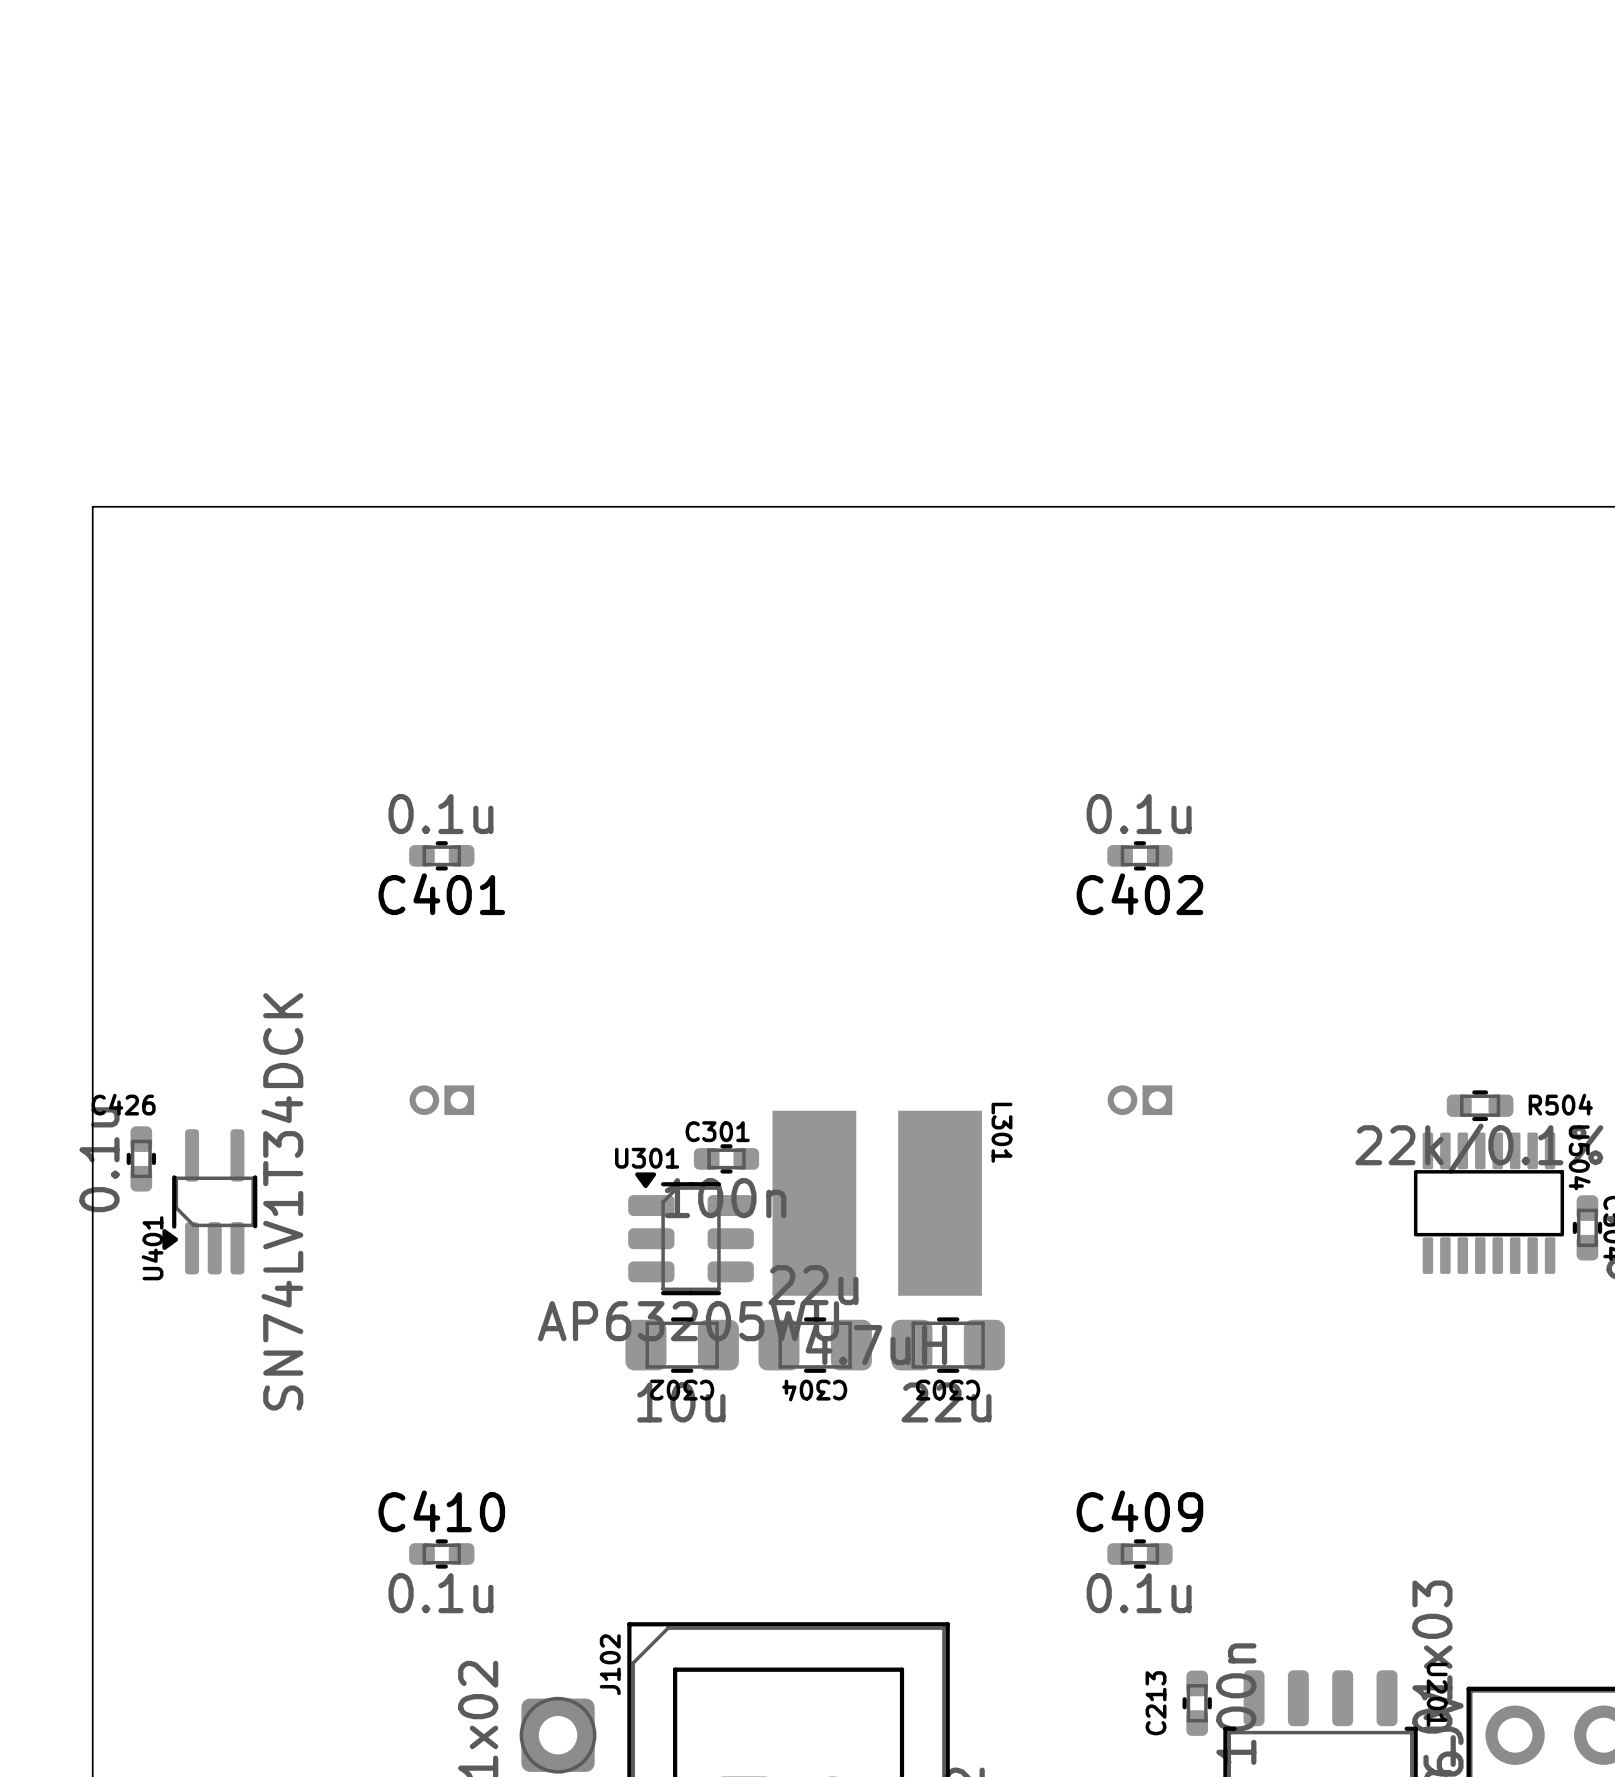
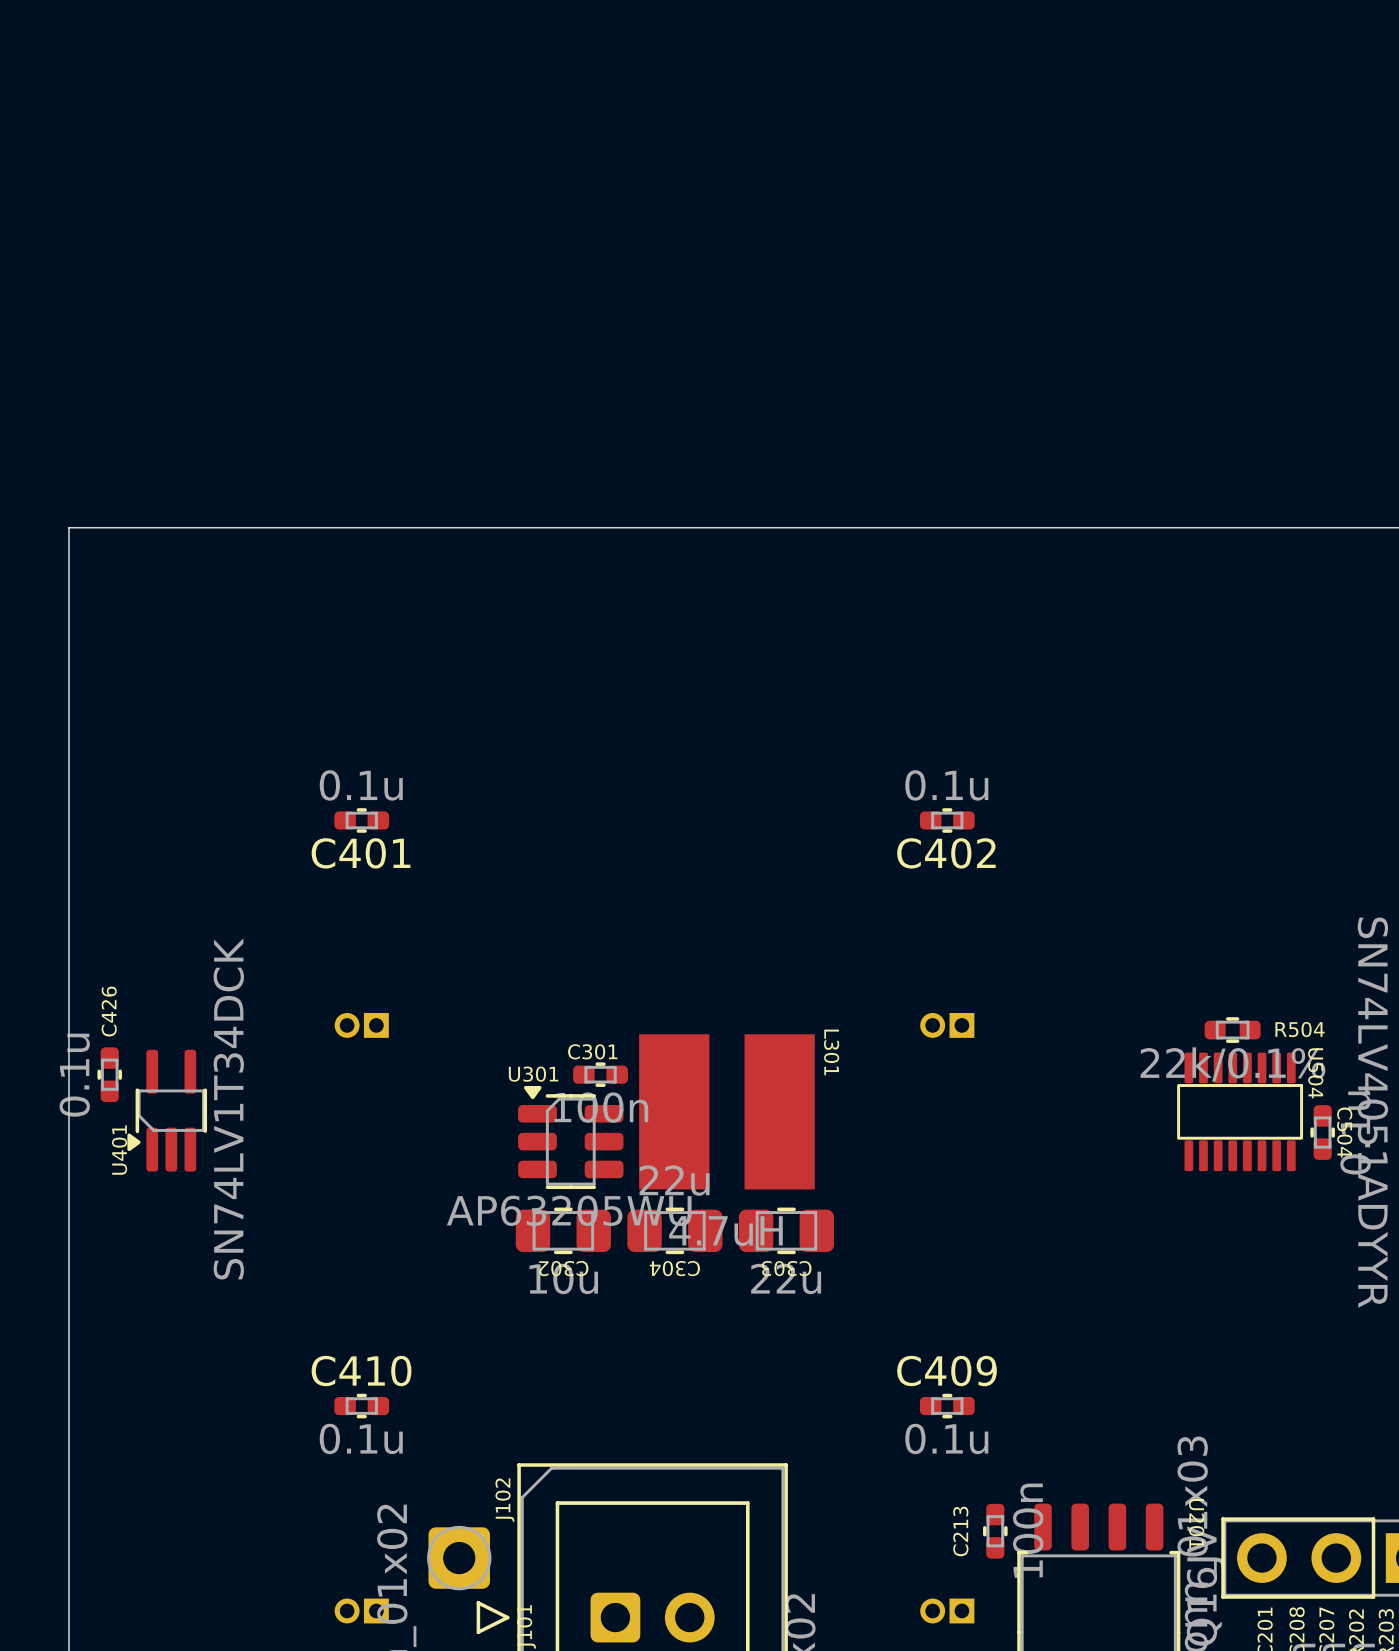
C426 name rotation: 0° (123, 1104) -> 90° counterclockwise (109, 1011)

